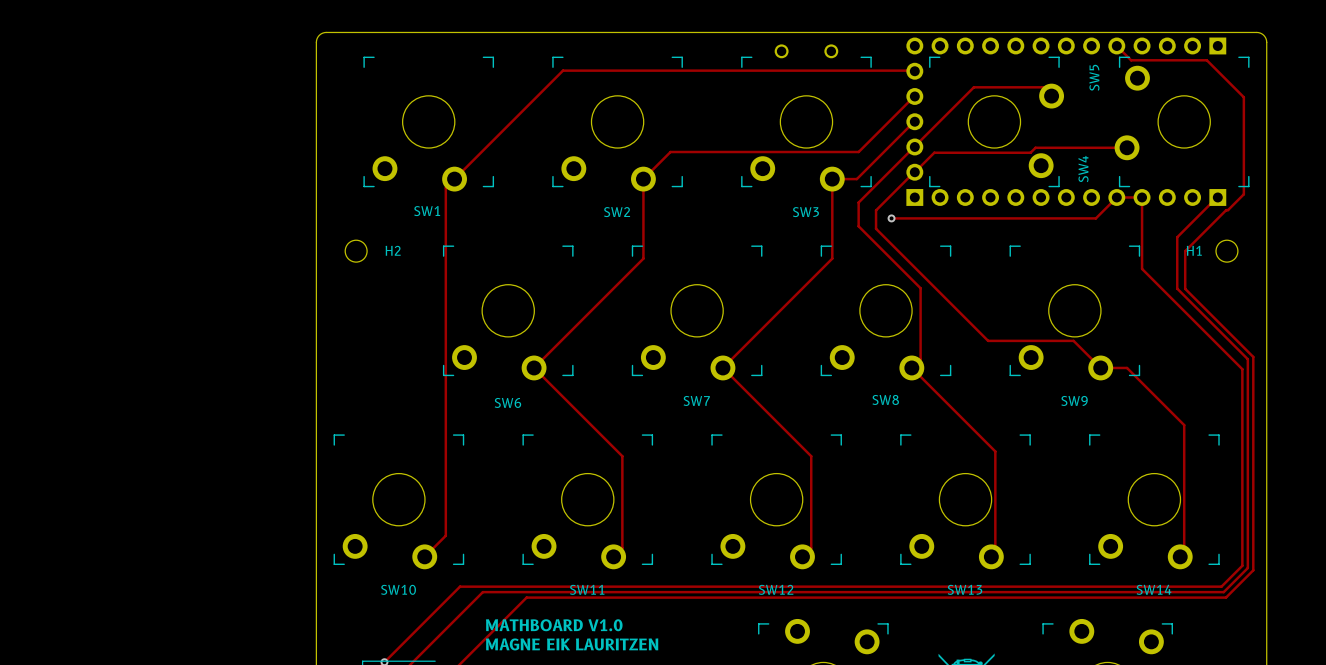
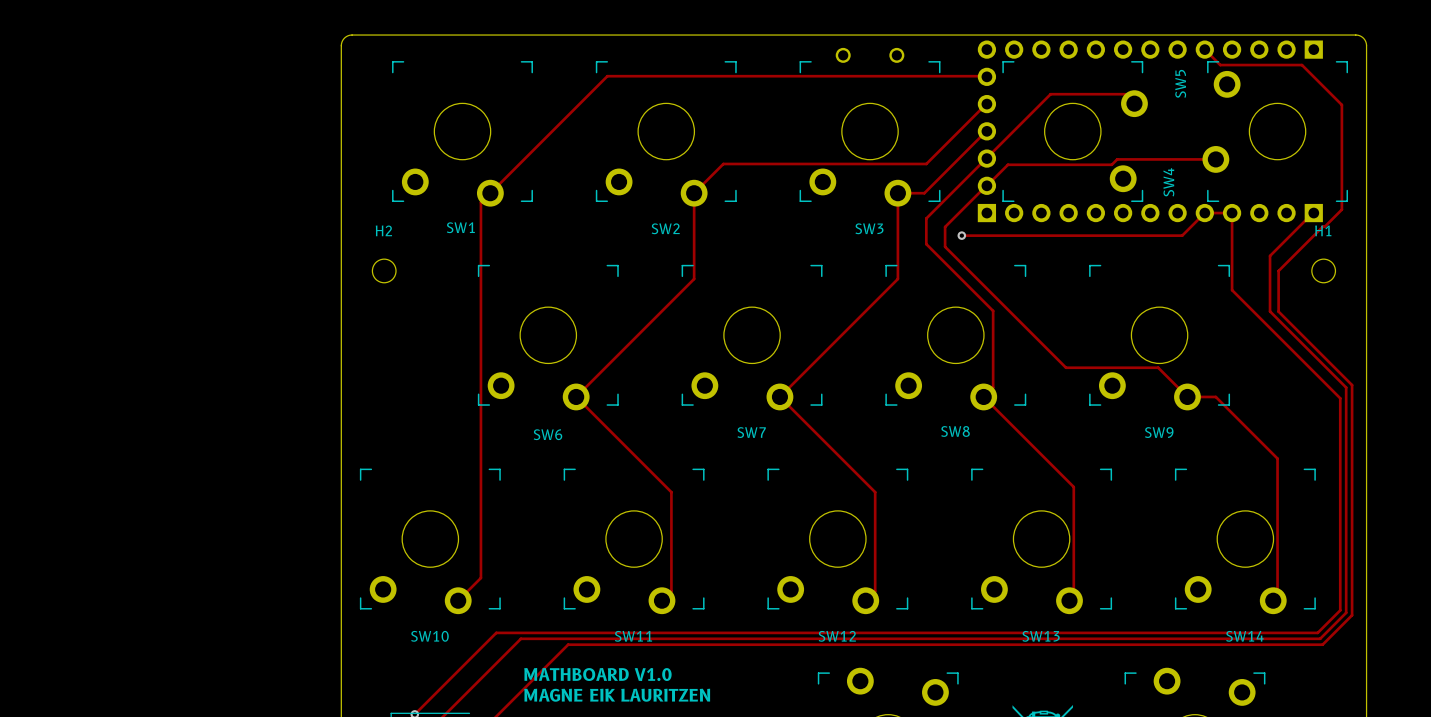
H2 name position: H2 (393, 250) -> H2 (383, 230)
H1 name position: H1 (1194, 250) -> H1 (1323, 230)

